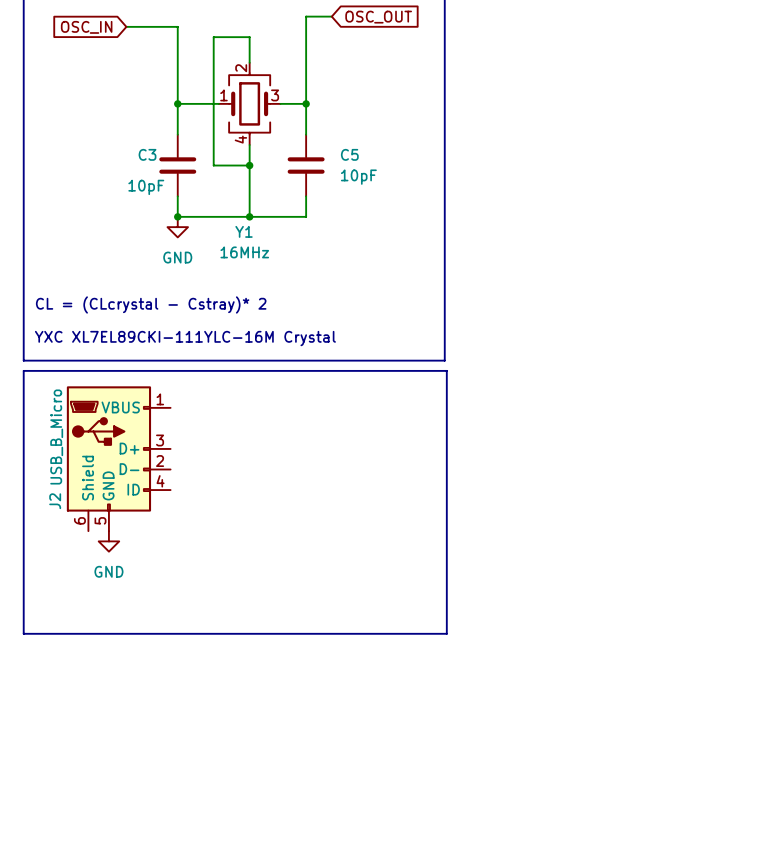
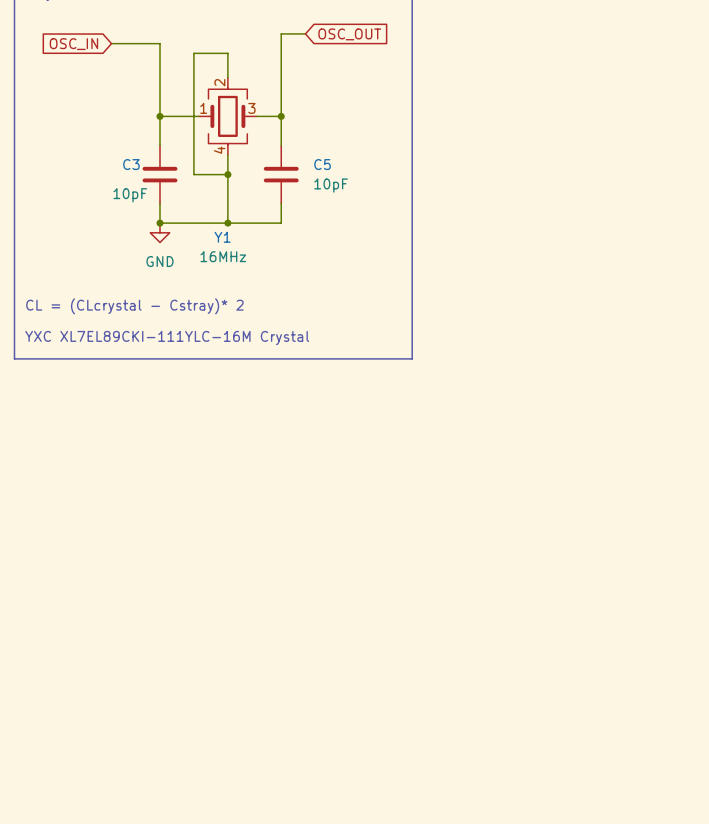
line: (23, 370) (446, 370) (446, 633) (23, 633) (23, 370) -> none
J2: USB_B_Micro (118, 458) -> none
power symbol: GND (108, 541) -> none

